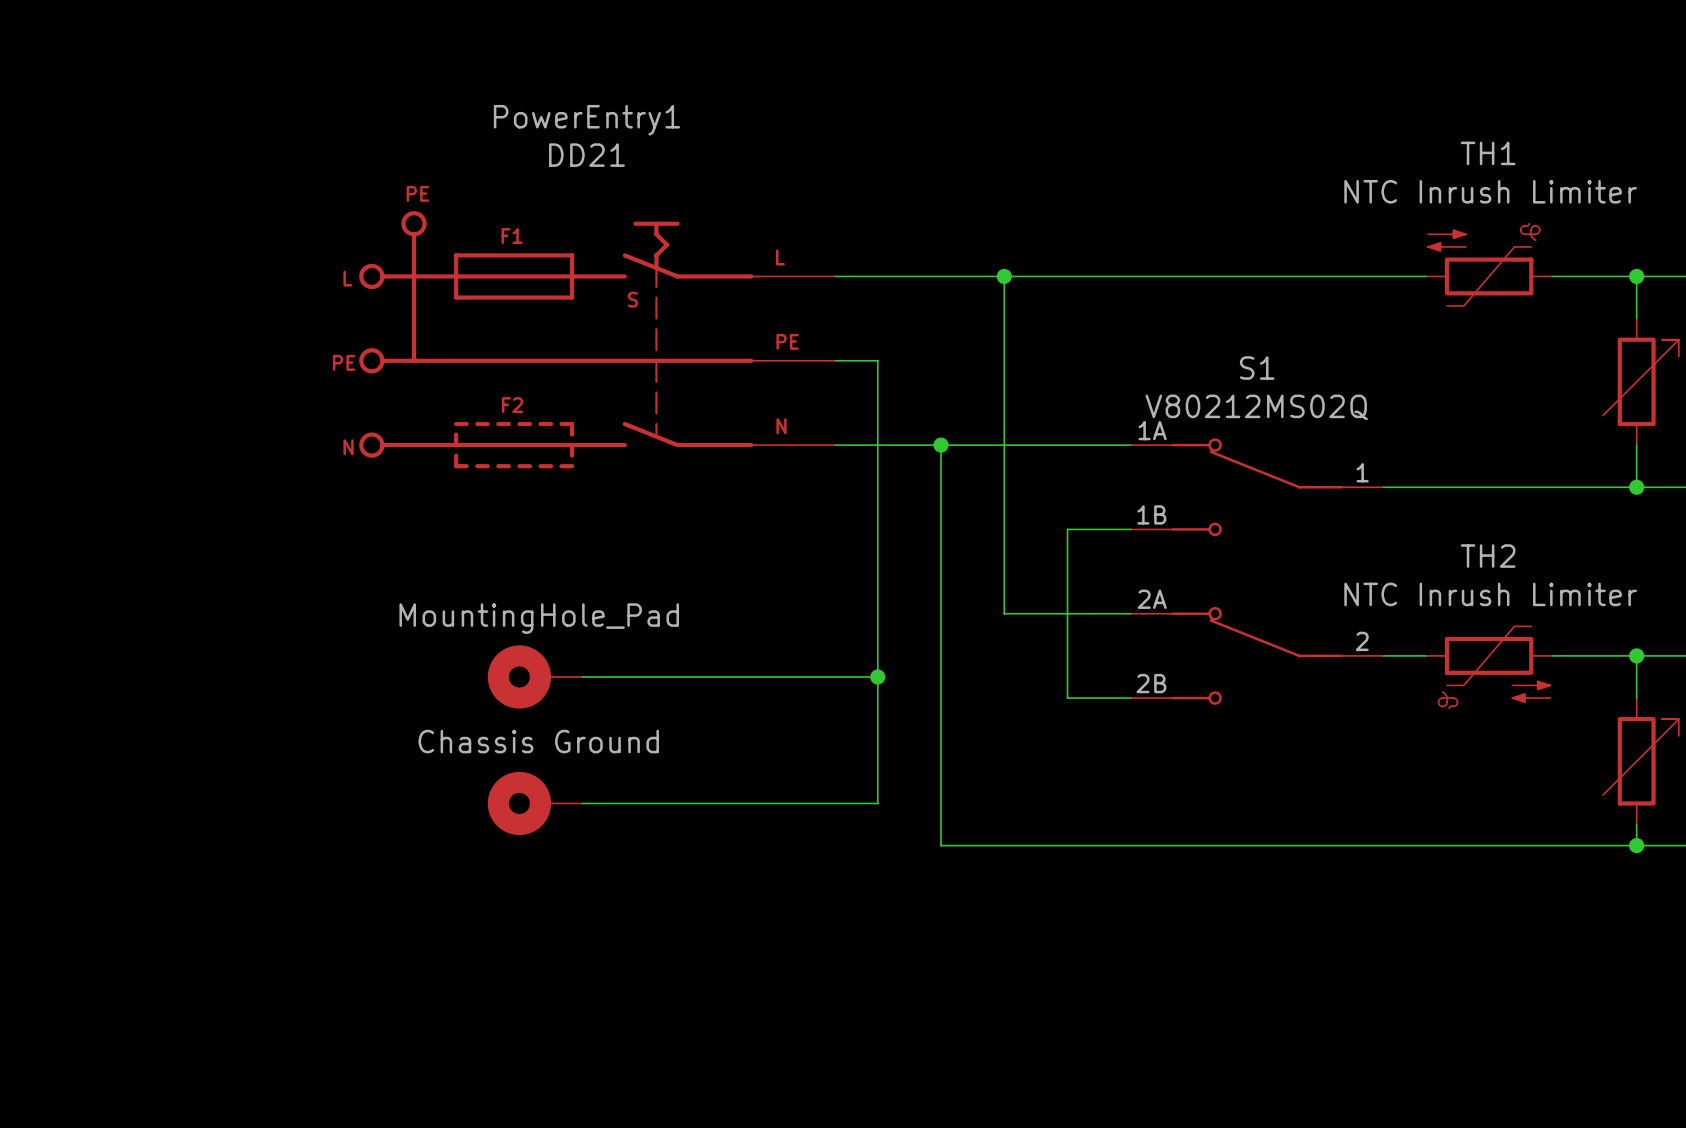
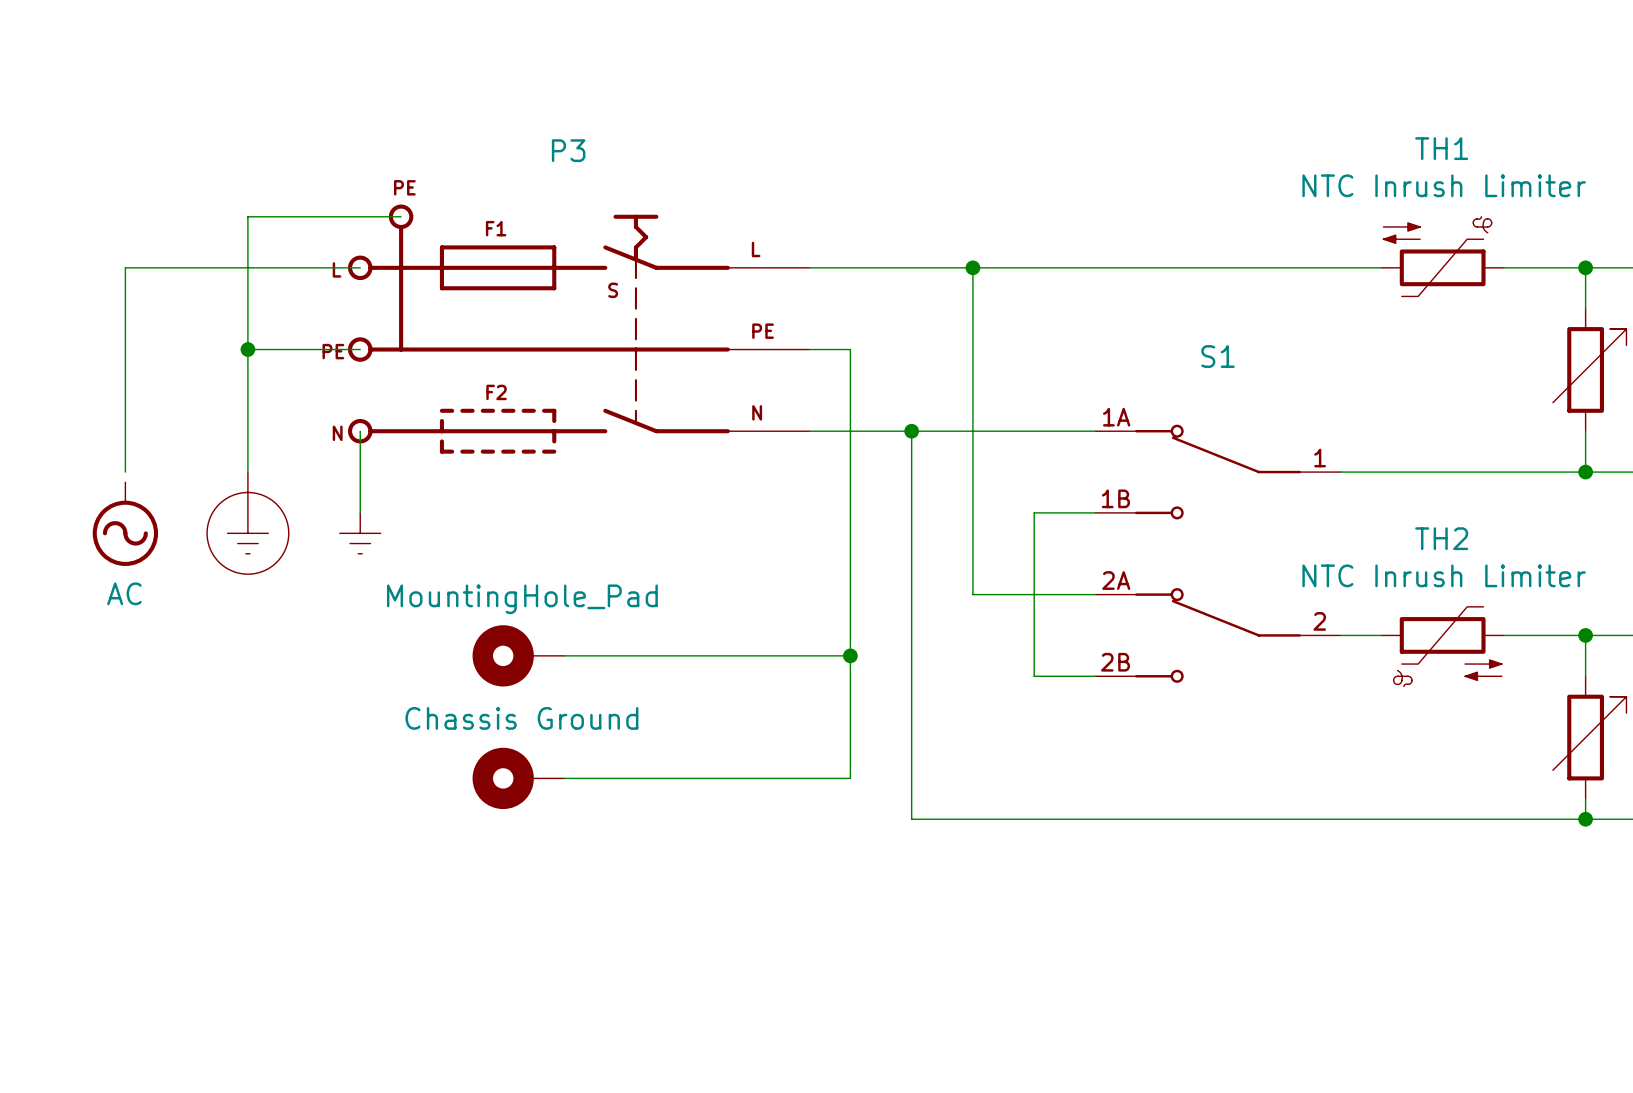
PowerEntry1 name: PowerEntry1 (586, 120) -> P3 (568, 150)
PowerEntry1 value: DD21 (586, 155) -> none
wire: none -> (401, 216) (247, 216) (247, 472)
wire: none -> (360, 267) (125, 267) (125, 472)
wire: none -> (247, 349) (360, 349)
junction: none -> (247, 349)
S1 value: V80212MS02Q (1256, 407) -> none
wire: none -> (360, 431) (360, 512)
power symbol: none -> (247, 523)
power symbol: none -> AC (125, 524)
power symbol: none -> (360, 533)

